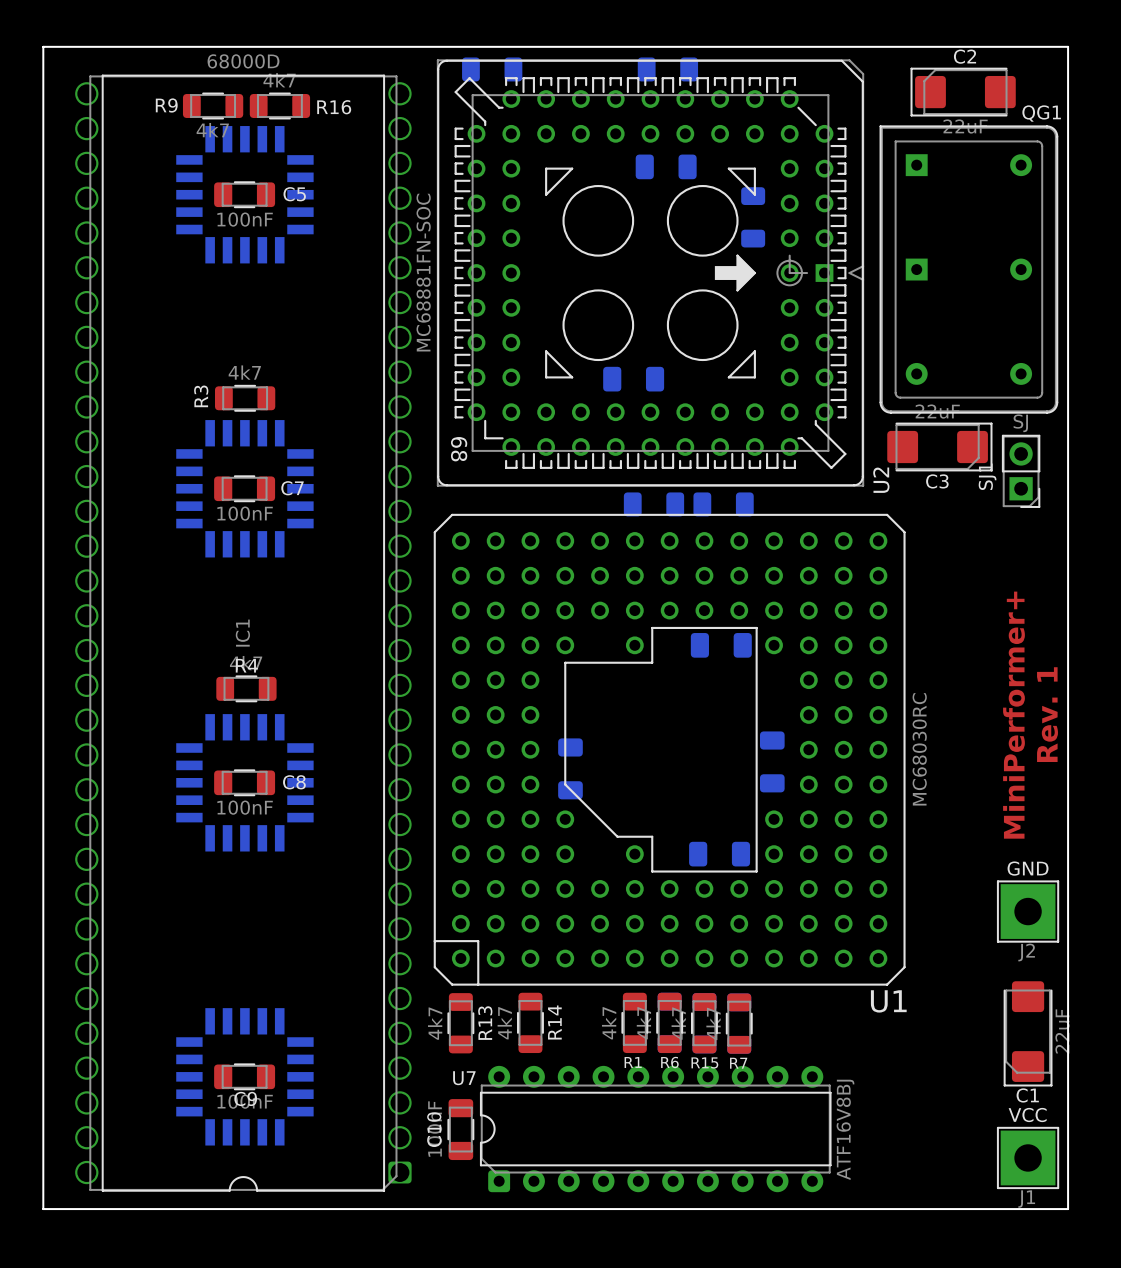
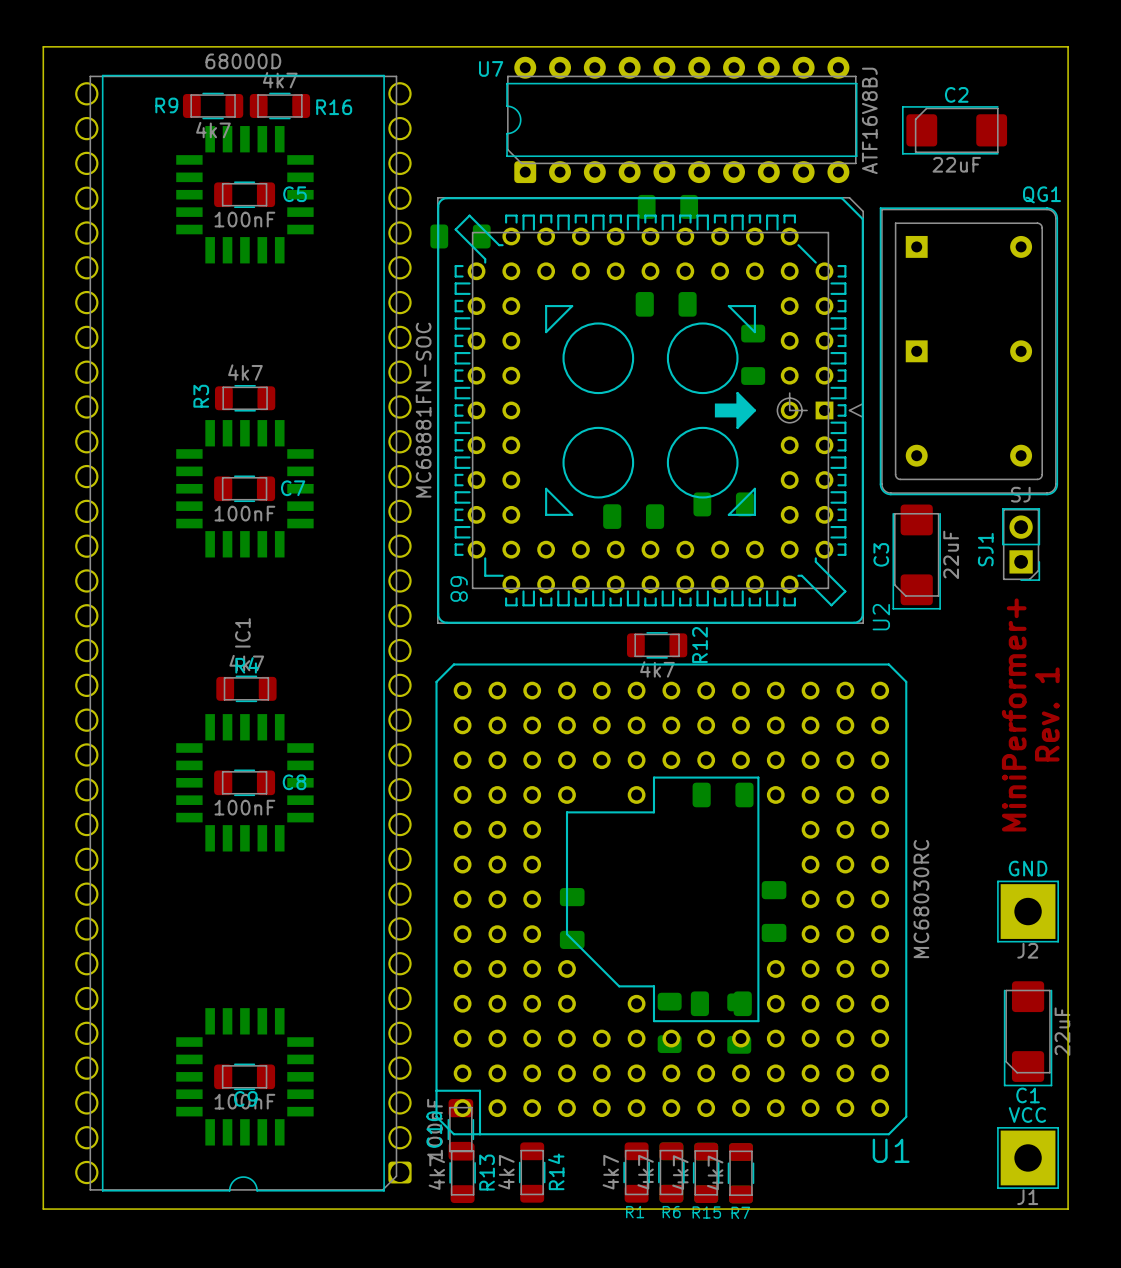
part: (492, 69) -> none
part: (667, 69) -> none
C2 position: (963, 92) -> (954, 130)
part: (666, 166) -> none
part: none -> (667, 206)
part: (753, 217) -> none
part: none -> (460, 236)
QG1 position: (968, 269) -> (968, 351)
U2 position: (650, 273) -> (650, 410)
part: none -> (666, 304)
part: none -> (753, 354)
part: (633, 379) -> none
C3 rotation: 0° (939, 447) -> 90° clockwise (916, 557)
C3 position: (939, 447) -> (916, 557)
SJ1 position: (1021, 471) -> (1021, 544)
R12 side: bottom (653, 504) -> top (657, 645)
part: none -> (633, 516)
part: (721, 645) -> none
U1 position: (669, 749) -> (671, 899)
part: (772, 761) -> none
part: (570, 768) -> none
part: none -> (723, 794)
part: (719, 854) -> none
part: none -> (774, 911)
part: none -> (572, 918)
part: none -> (721, 1003)
R14 position: (530, 1022) -> (532, 1172)
R1 position: (634, 1022) -> (636, 1172)
R6 position: (669, 1022) -> (671, 1172)
R13 position: (460, 1023) -> (462, 1172)
R15 position: (704, 1023) -> (706, 1172)
R7 position: (739, 1023) -> (740, 1173)
U7 position: (655, 1129) -> (681, 119)

